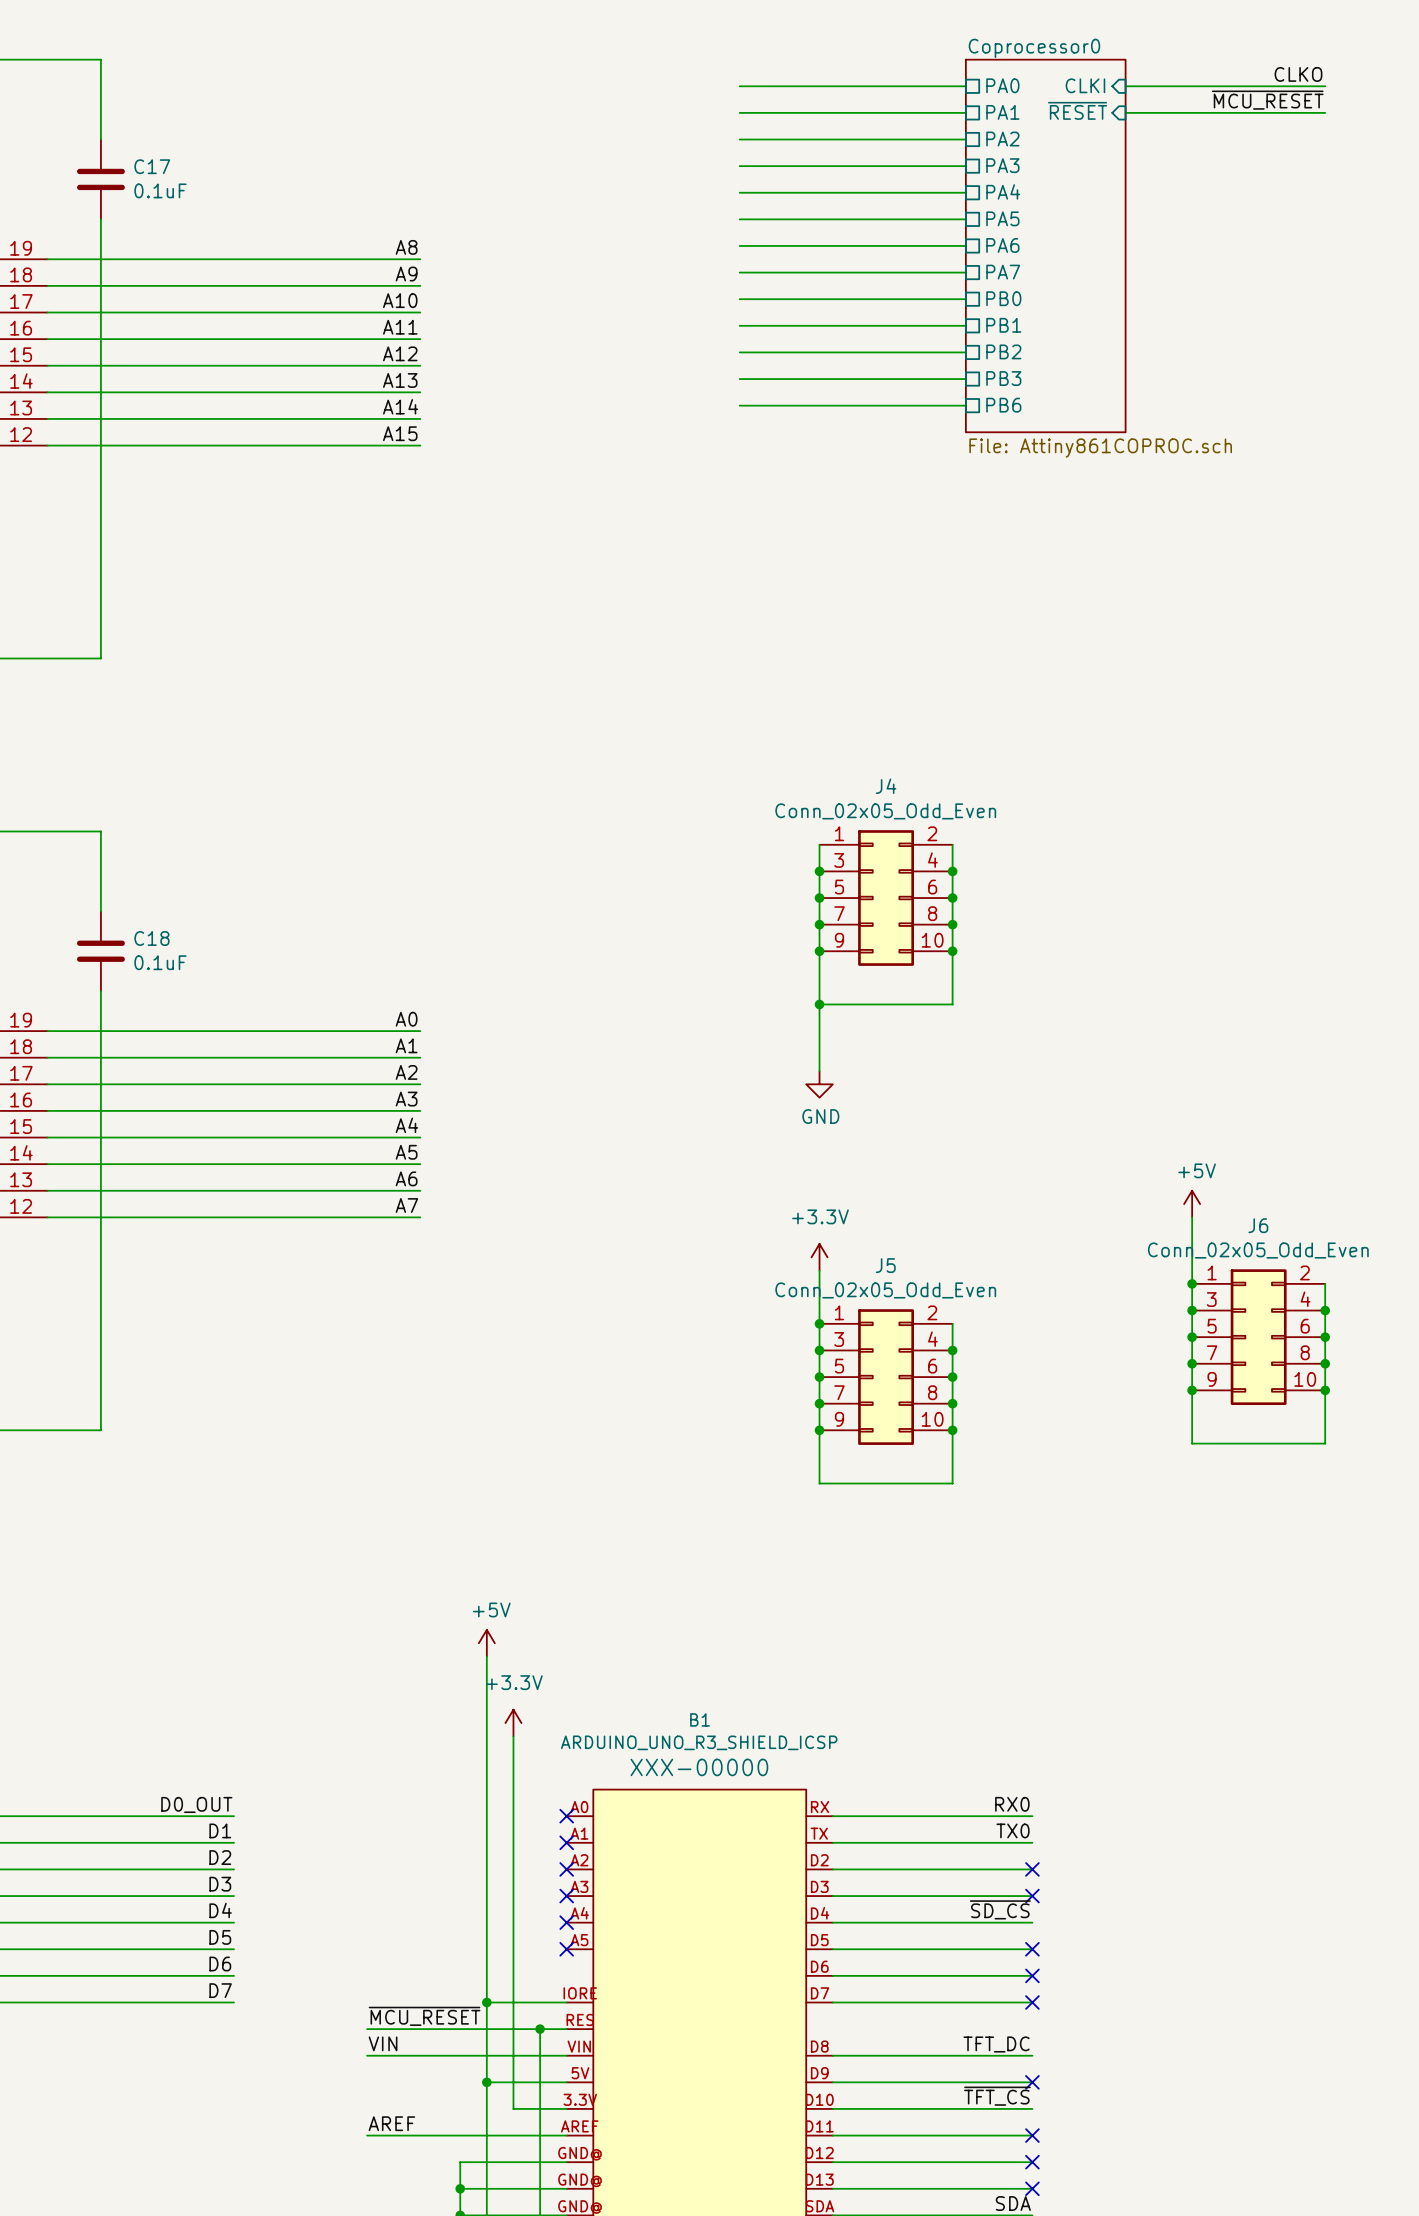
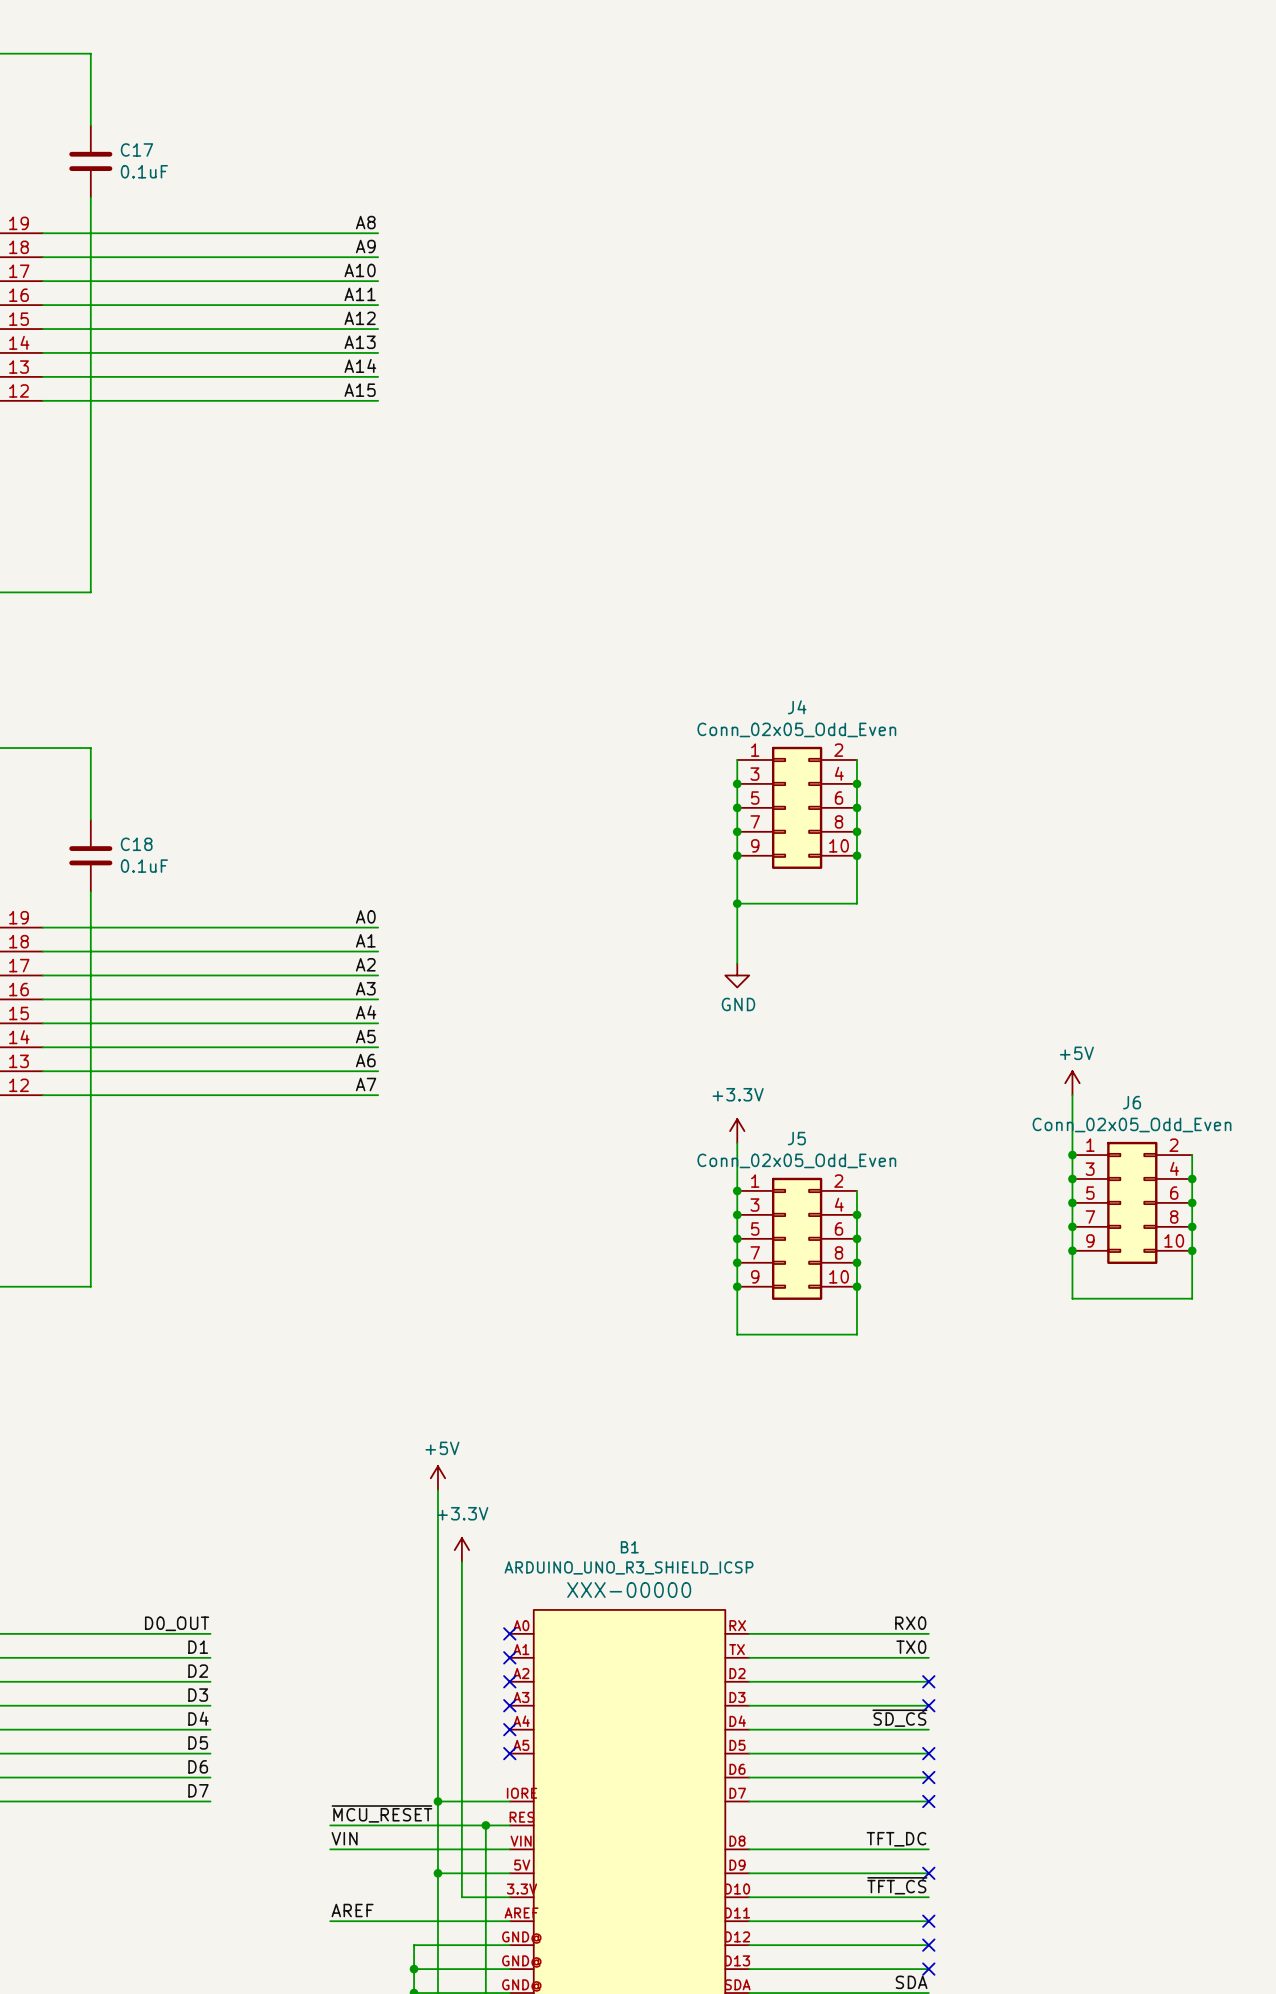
label: CLKO (1298, 74) -> none
sheet pin: PA0 (1002, 85) -> none
sheet pin: CLKI (1085, 85) -> none
wire: (739, 86) (965, 86) -> none
wire: (1125, 86) (1325, 86) -> none
label: ~{MCU_RESET} (1267, 100) -> none
sheet pin: ~{RESET} (1077, 110) -> none
wire: (739, 112) (965, 112) -> none
sheet pin: PA1 (1002, 112) -> none
wire: (1125, 112) (1325, 112) -> none
wire: (739, 139) (965, 139) -> none
sheet pin: PA2 (1002, 139) -> none
sheet pin: PA3 (1002, 165) -> none
wire: (739, 166) (965, 166) -> none
sheet pin: PA4 (1003, 191) -> none
wire: (739, 192) (965, 192) -> none
sheet pin: PA5 (1002, 218) -> none
wire: (739, 219) (965, 219) -> none
wire: (739, 245) (965, 245) -> none
sheet pin: PA6 (1002, 245) -> none
sheet Coprocessor0: File: Attiny861COPROC.sch (1045, 245) -> none
wire: (739, 272) (965, 272) -> none
sheet pin: PA7 (1003, 272) -> none
sheet pin: PB0 (1003, 298) -> none
wire: (739, 299) (965, 299) -> none
wire: (739, 325) (965, 325) -> none
sheet pin: PB1 (1003, 325) -> none
sheet pin: PB2 (1003, 351) -> none
wire: (739, 352) (965, 352) -> none
sheet pin: PB3 (1003, 378) -> none
wire: (739, 379) (965, 379) -> none
wire: (739, 405) (965, 405) -> none
sheet pin: PB6 (1003, 405) -> none

